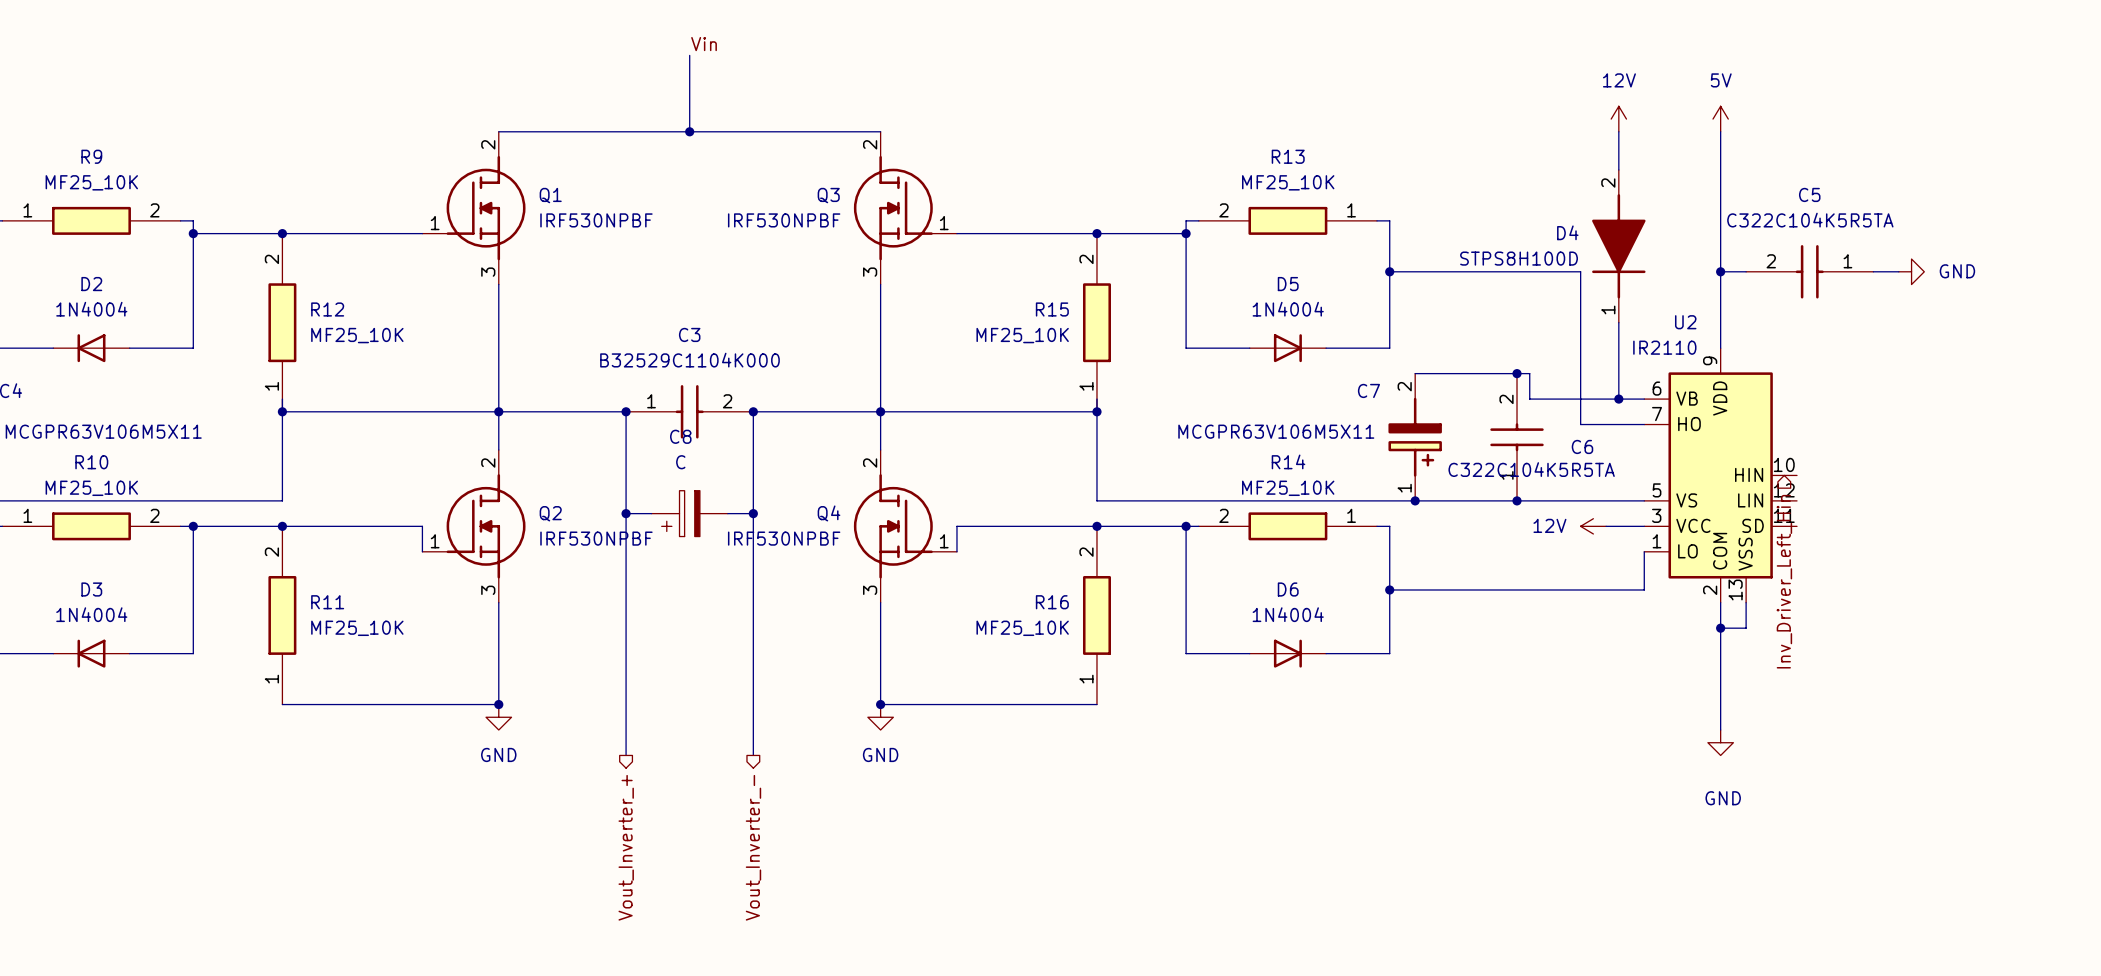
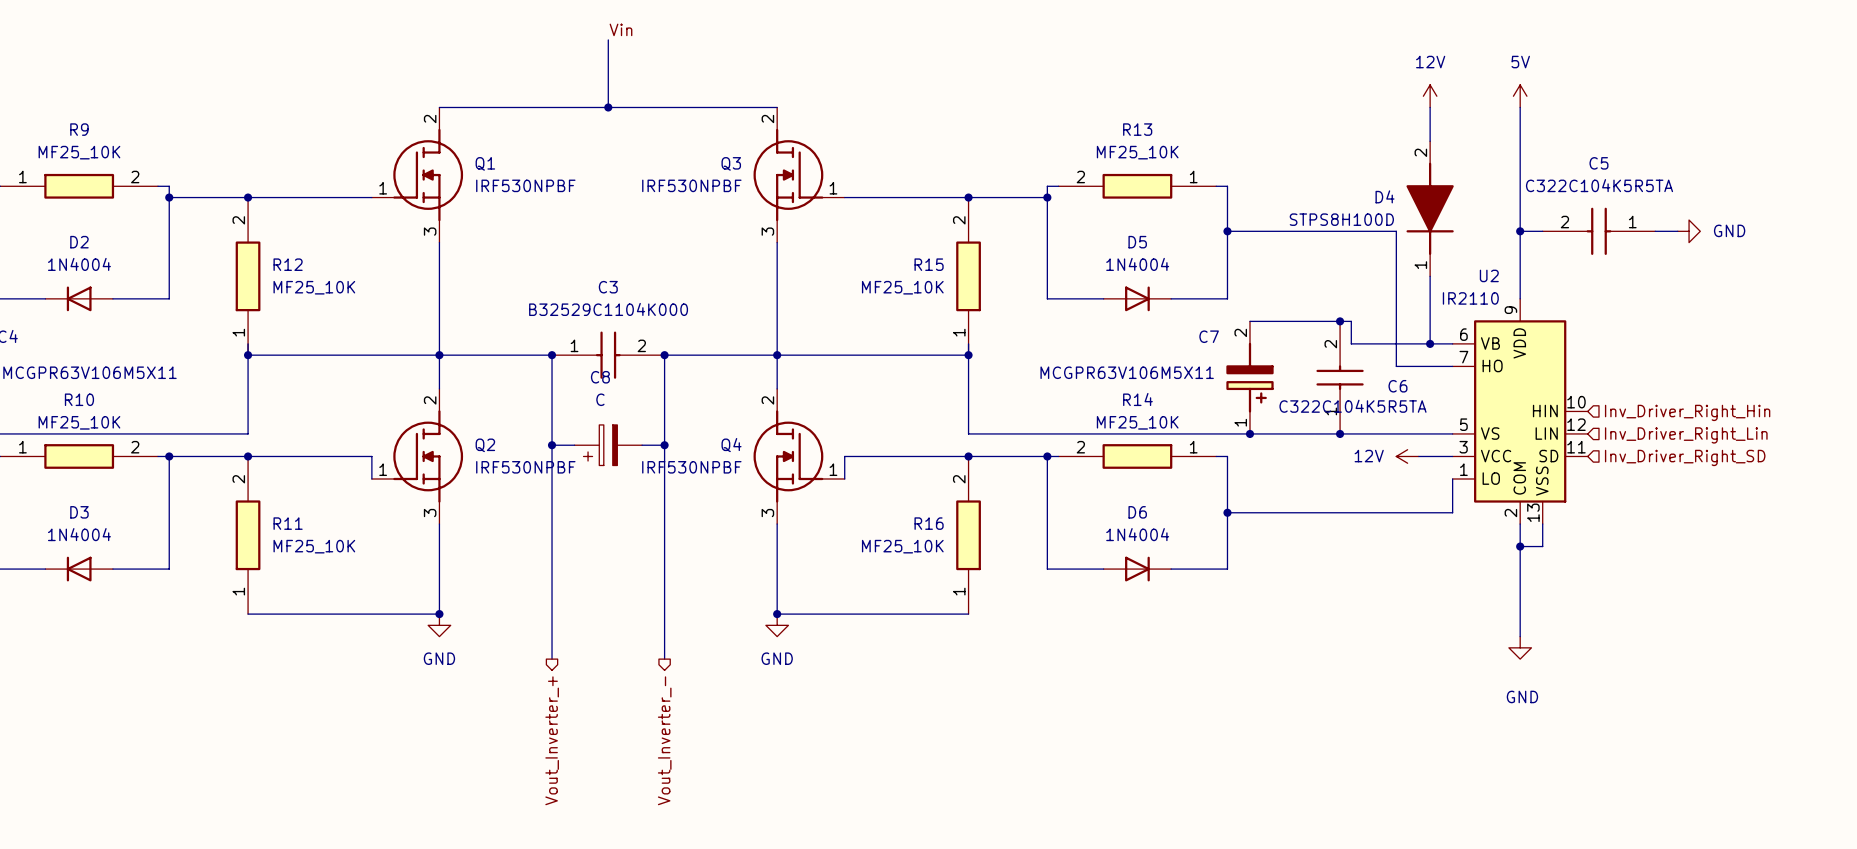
hierarchical label: none -> Inv_Driver_Right_Hin (1687, 412)
hierarchical label: none -> Inv_Driver_Right_Lin (1686, 435)
hierarchical label: none -> Inv_Driver_Right_SD (1685, 457)
hierarchical label: Inv_Driver_Left_Hin (1784, 581) -> none

